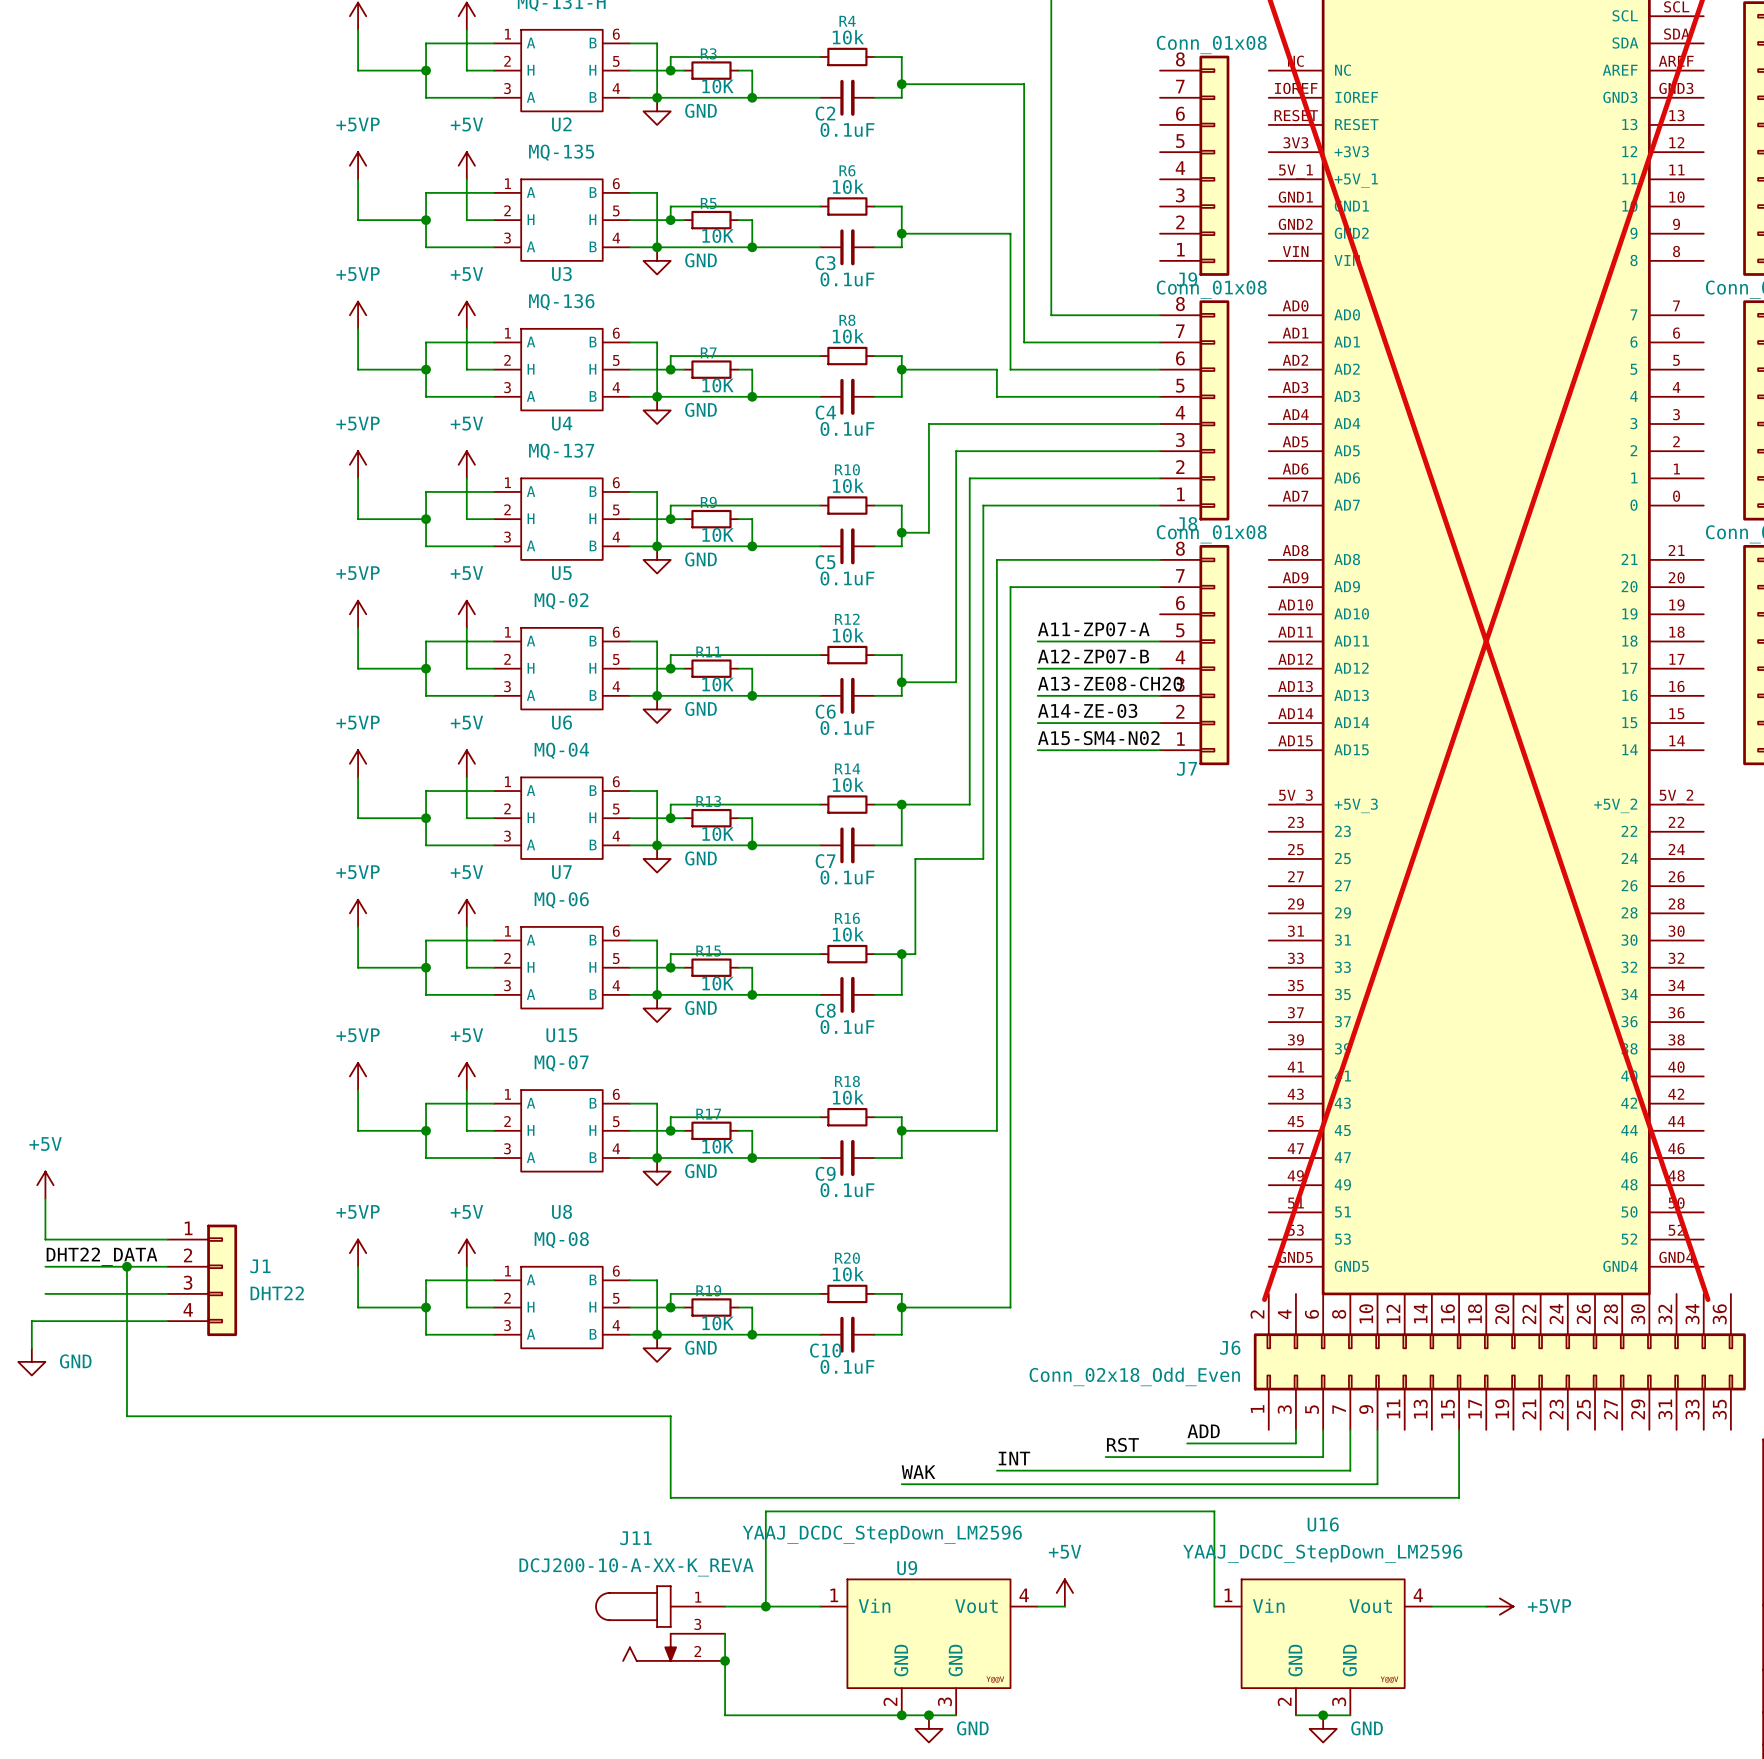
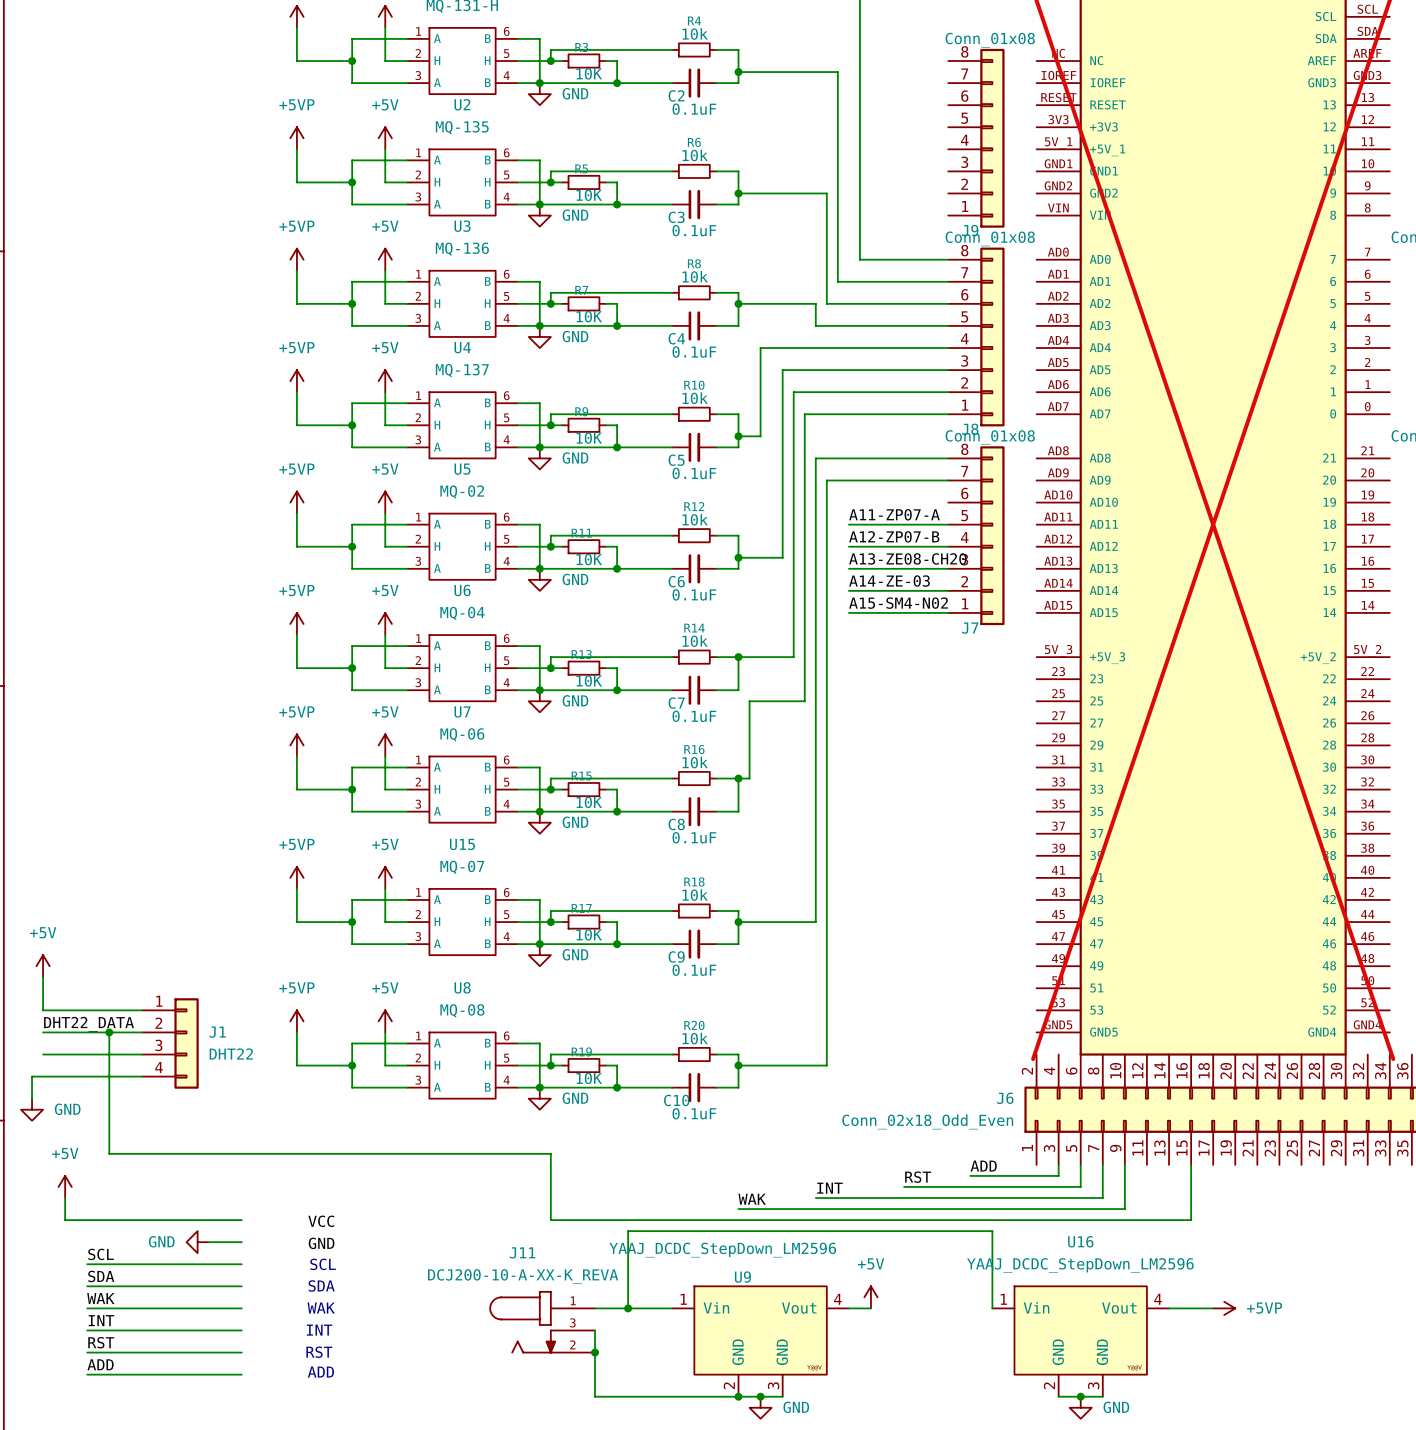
power symbol: none -> +5V (65, 1186)
wire: none -> (65, 1198) (65, 1220) (241, 1220)
label: none -> VCC (321, 1221)
power symbol: none -> GND (197, 1242)
wire: none -> (208, 1242) (241, 1242)
label: none -> GND (321, 1243)
label: none -> SCL (101, 1254)
wire: none -> (87, 1264) (241, 1264)
text: none -> SCL (323, 1264)
label: none -> SDA (101, 1276)
text: none -> SDA (321, 1285)
wire: none -> (87, 1286) (241, 1286)
label: none -> WAK (100, 1298)
wire: none -> (87, 1308) (241, 1308)
text: none -> WAK (321, 1308)
label: none -> INT (101, 1320)
wire: none -> (87, 1330) (241, 1330)
text: none -> INT (319, 1330)
label: none -> RST (101, 1342)
wire: none -> (87, 1352) (241, 1352)
text: none -> RST (319, 1352)
label: none -> ADD (100, 1364)
text: none -> ADD (320, 1372)
wire: none -> (87, 1374) (241, 1374)

